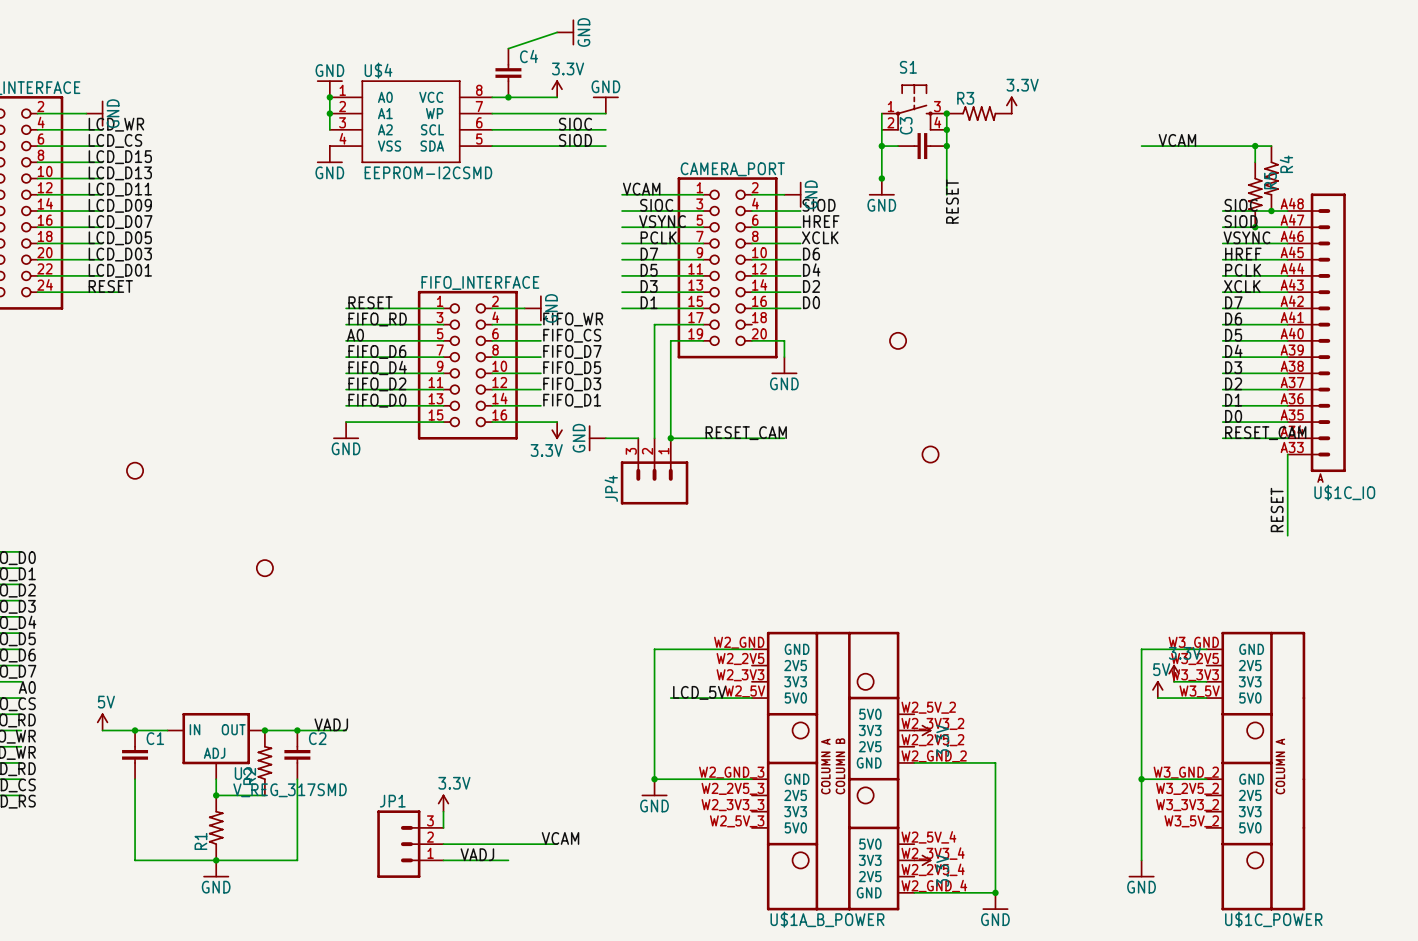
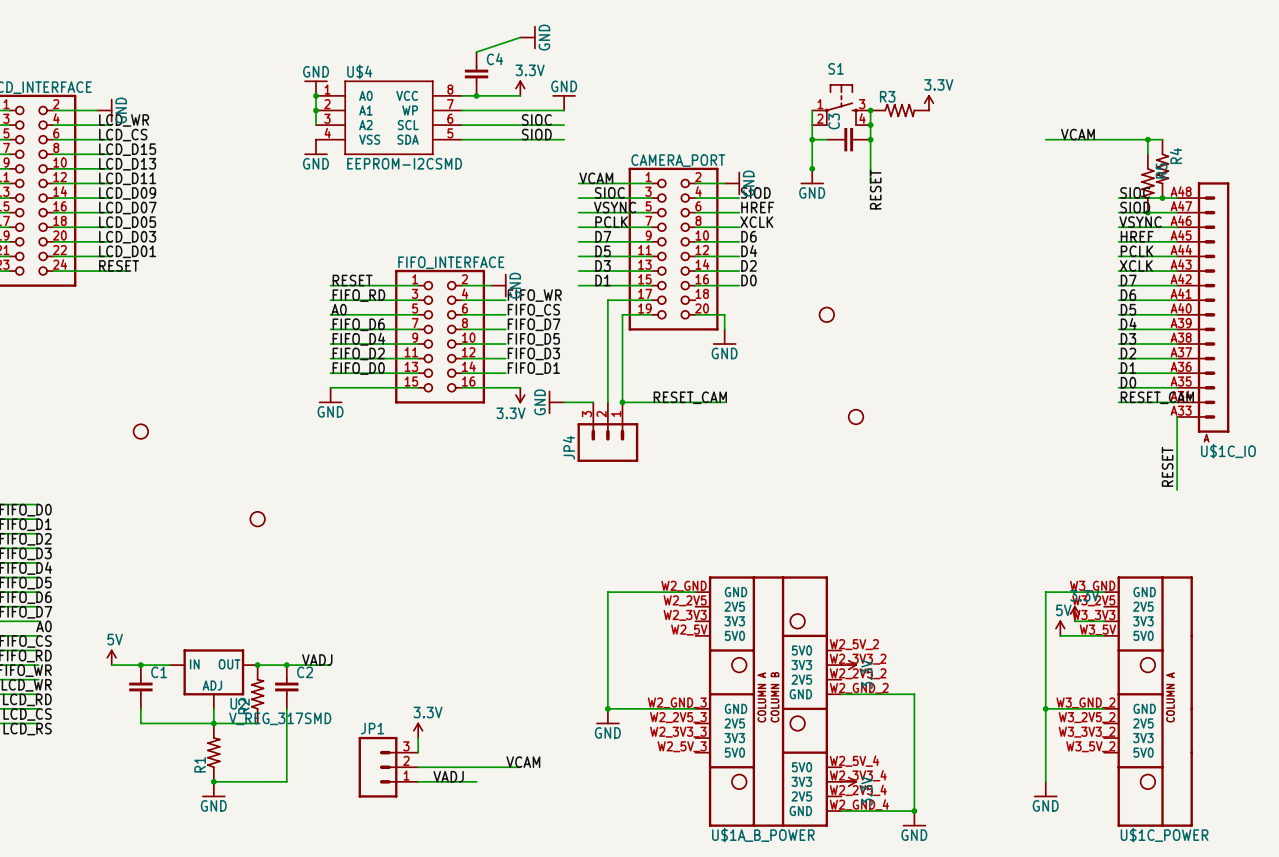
label: LCD_5V (699, 692) -> none
wire: (670, 698) (751, 698) -> none
wire: (135, 795) (135, 860) (216, 860) -> (140, 723) (213, 723)

